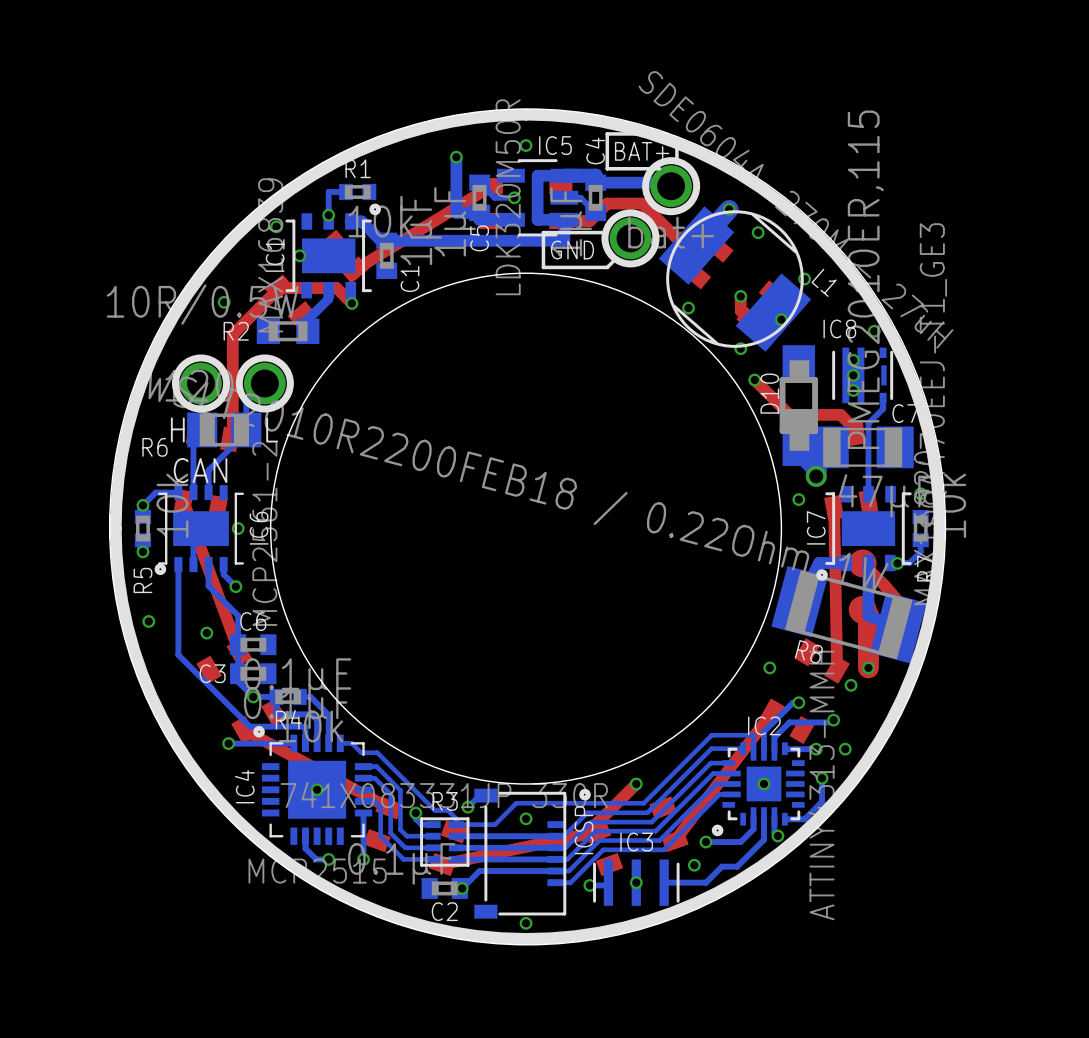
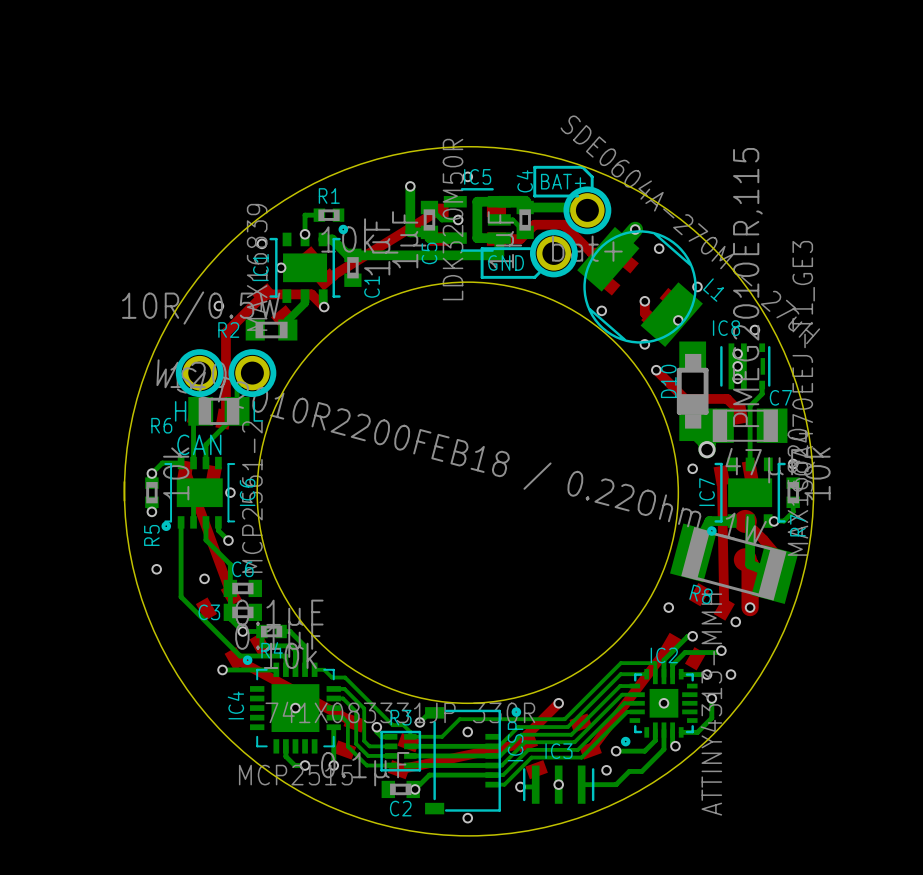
line: (526, 114) (476, 117) (427, 127) (403, 133) (357, 151) (334, 162) (292, 188) (272, 203) (235, 236) (202, 274) (187, 294) (174, 315) (151, 359) (133, 405) (127, 429) (118, 478) (115, 528) (122, 602) (134, 650) (151, 696) (188, 761) (235, 818) (293, 866) (357, 902) (403, 920) (452, 932) (526, 938) (550, 938) (600, 932) (624, 927) (672, 912) (695, 903) (739, 880) (780, 852) (817, 819) (834, 801) (865, 762) (891, 719) (902, 697) (912, 674) (927, 627) (936, 578) (939, 528) (936, 478) (927, 429) (920, 405) (903, 358) (892, 336) (866, 293) (851, 273) (818, 236) (781, 202) (761, 188) (718, 162) (695, 151) (649, 133) (600, 121) (575, 117) (526, 114) -> none
IC5 name position: IC5 (555, 145) -> IC5 (477, 176)

